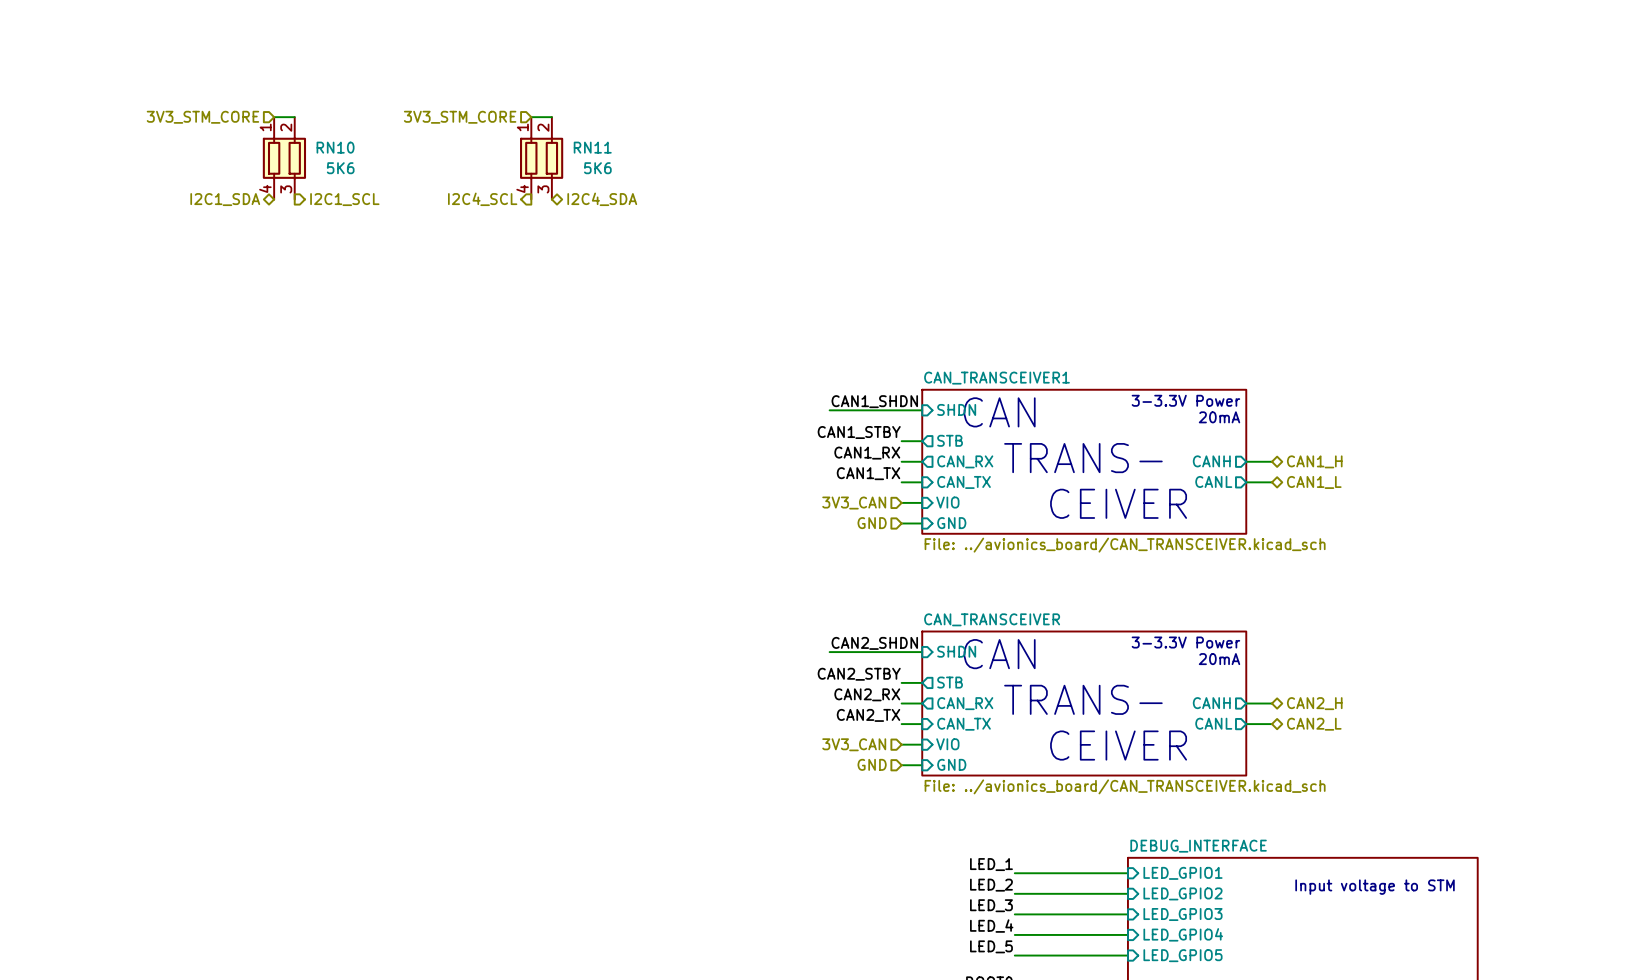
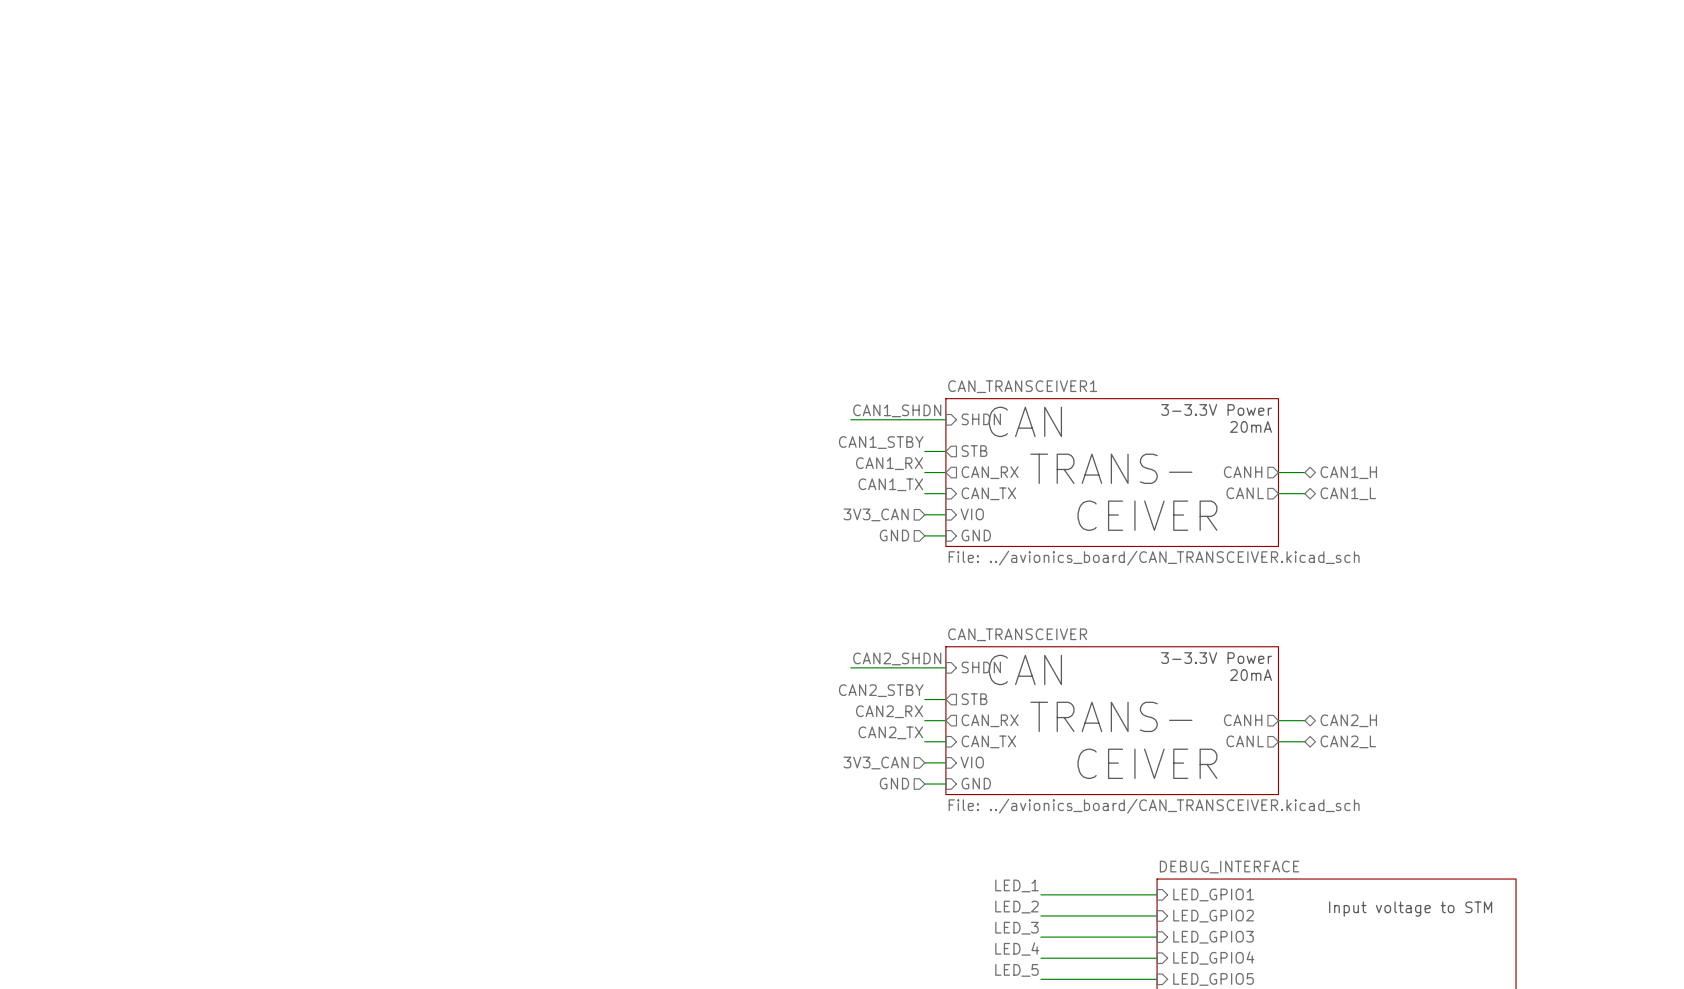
hierarchical label: 3V3_STM_CORE (202, 117) -> none
wire: (274, 117) (294, 117) -> none
hierarchical label: 3V3_STM_CORE (460, 117) -> none
wire: (531, 117) (551, 117) -> none
RN10: 5K6 (284, 158) -> none
RN11: 5K6 (541, 158) -> none
hierarchical label: I2C1_SDA (225, 199) -> none
hierarchical label: I2C1_SCL (344, 199) -> none
hierarchical label: I2C4_SCL (482, 199) -> none
hierarchical label: I2C4_SDA (602, 199) -> none

